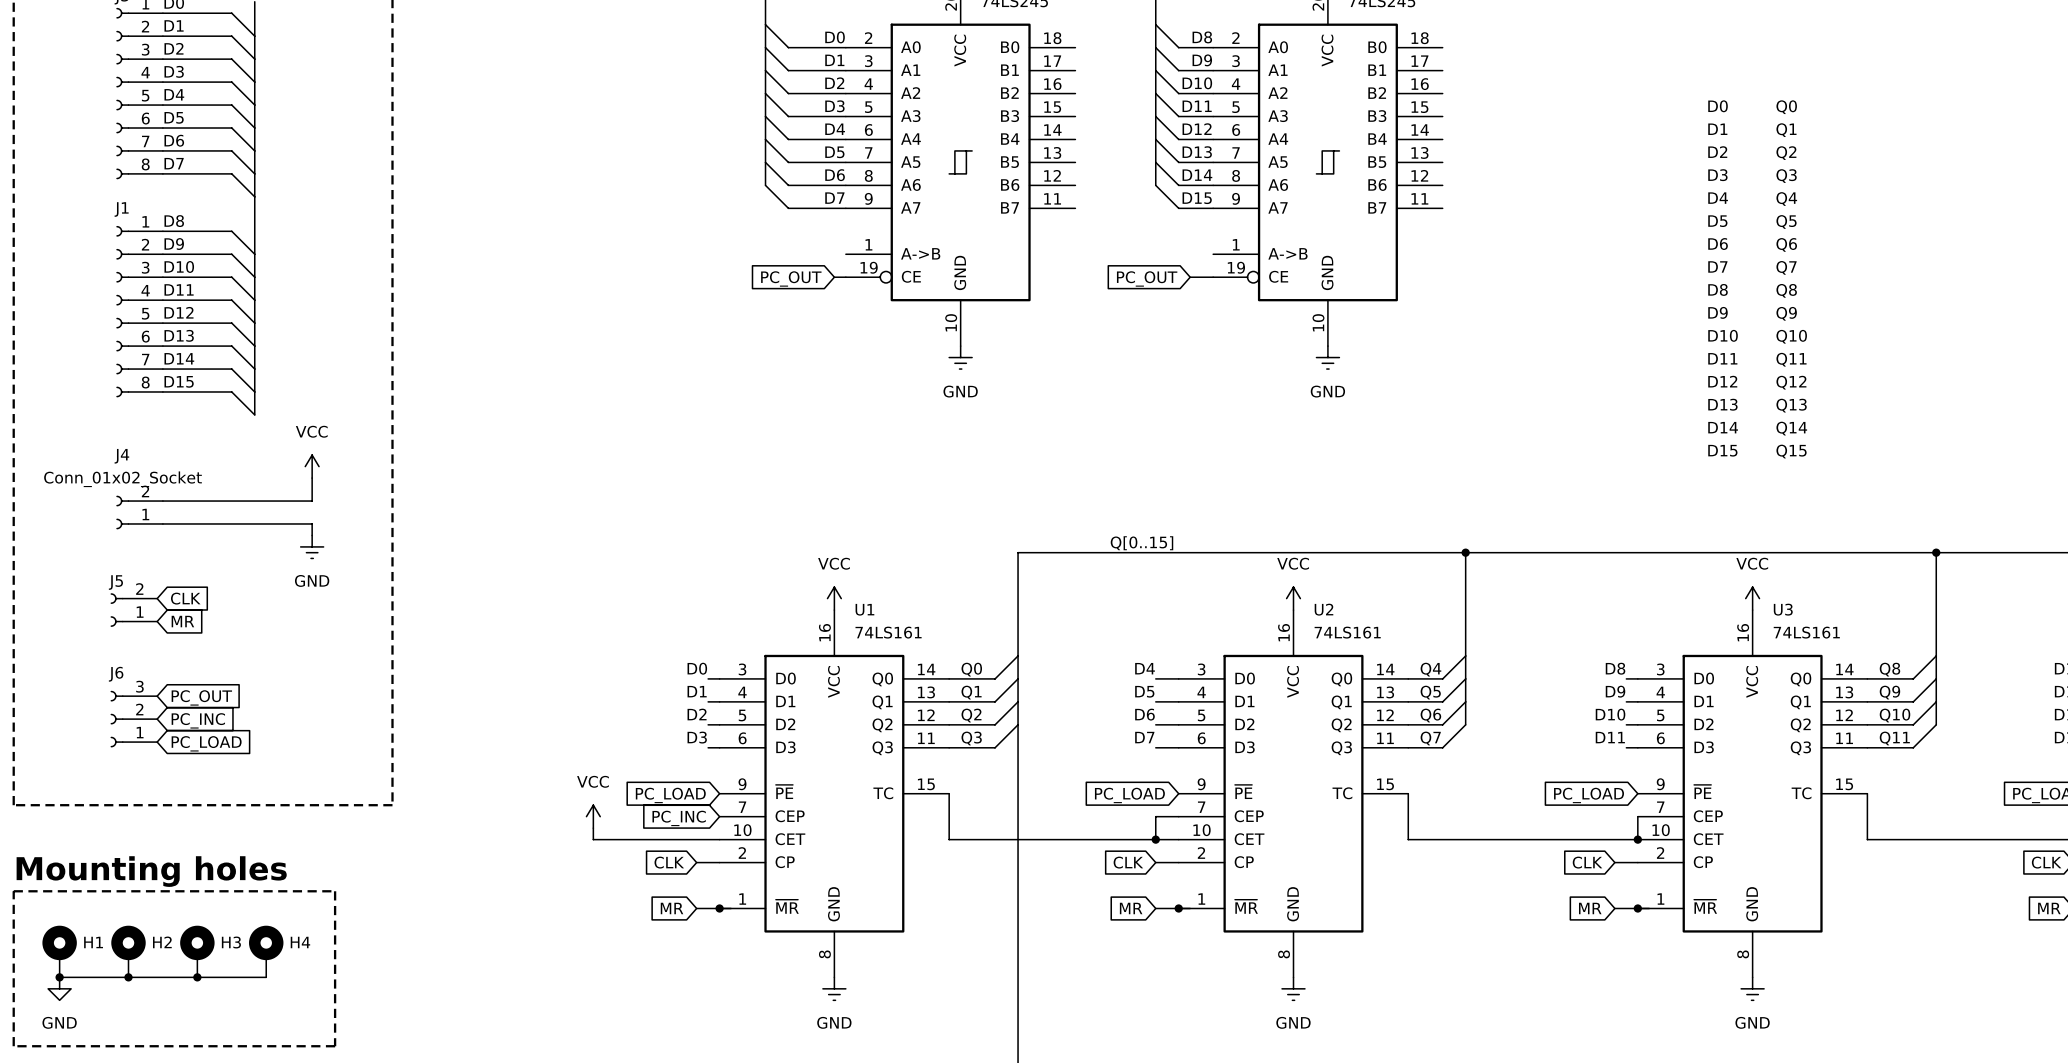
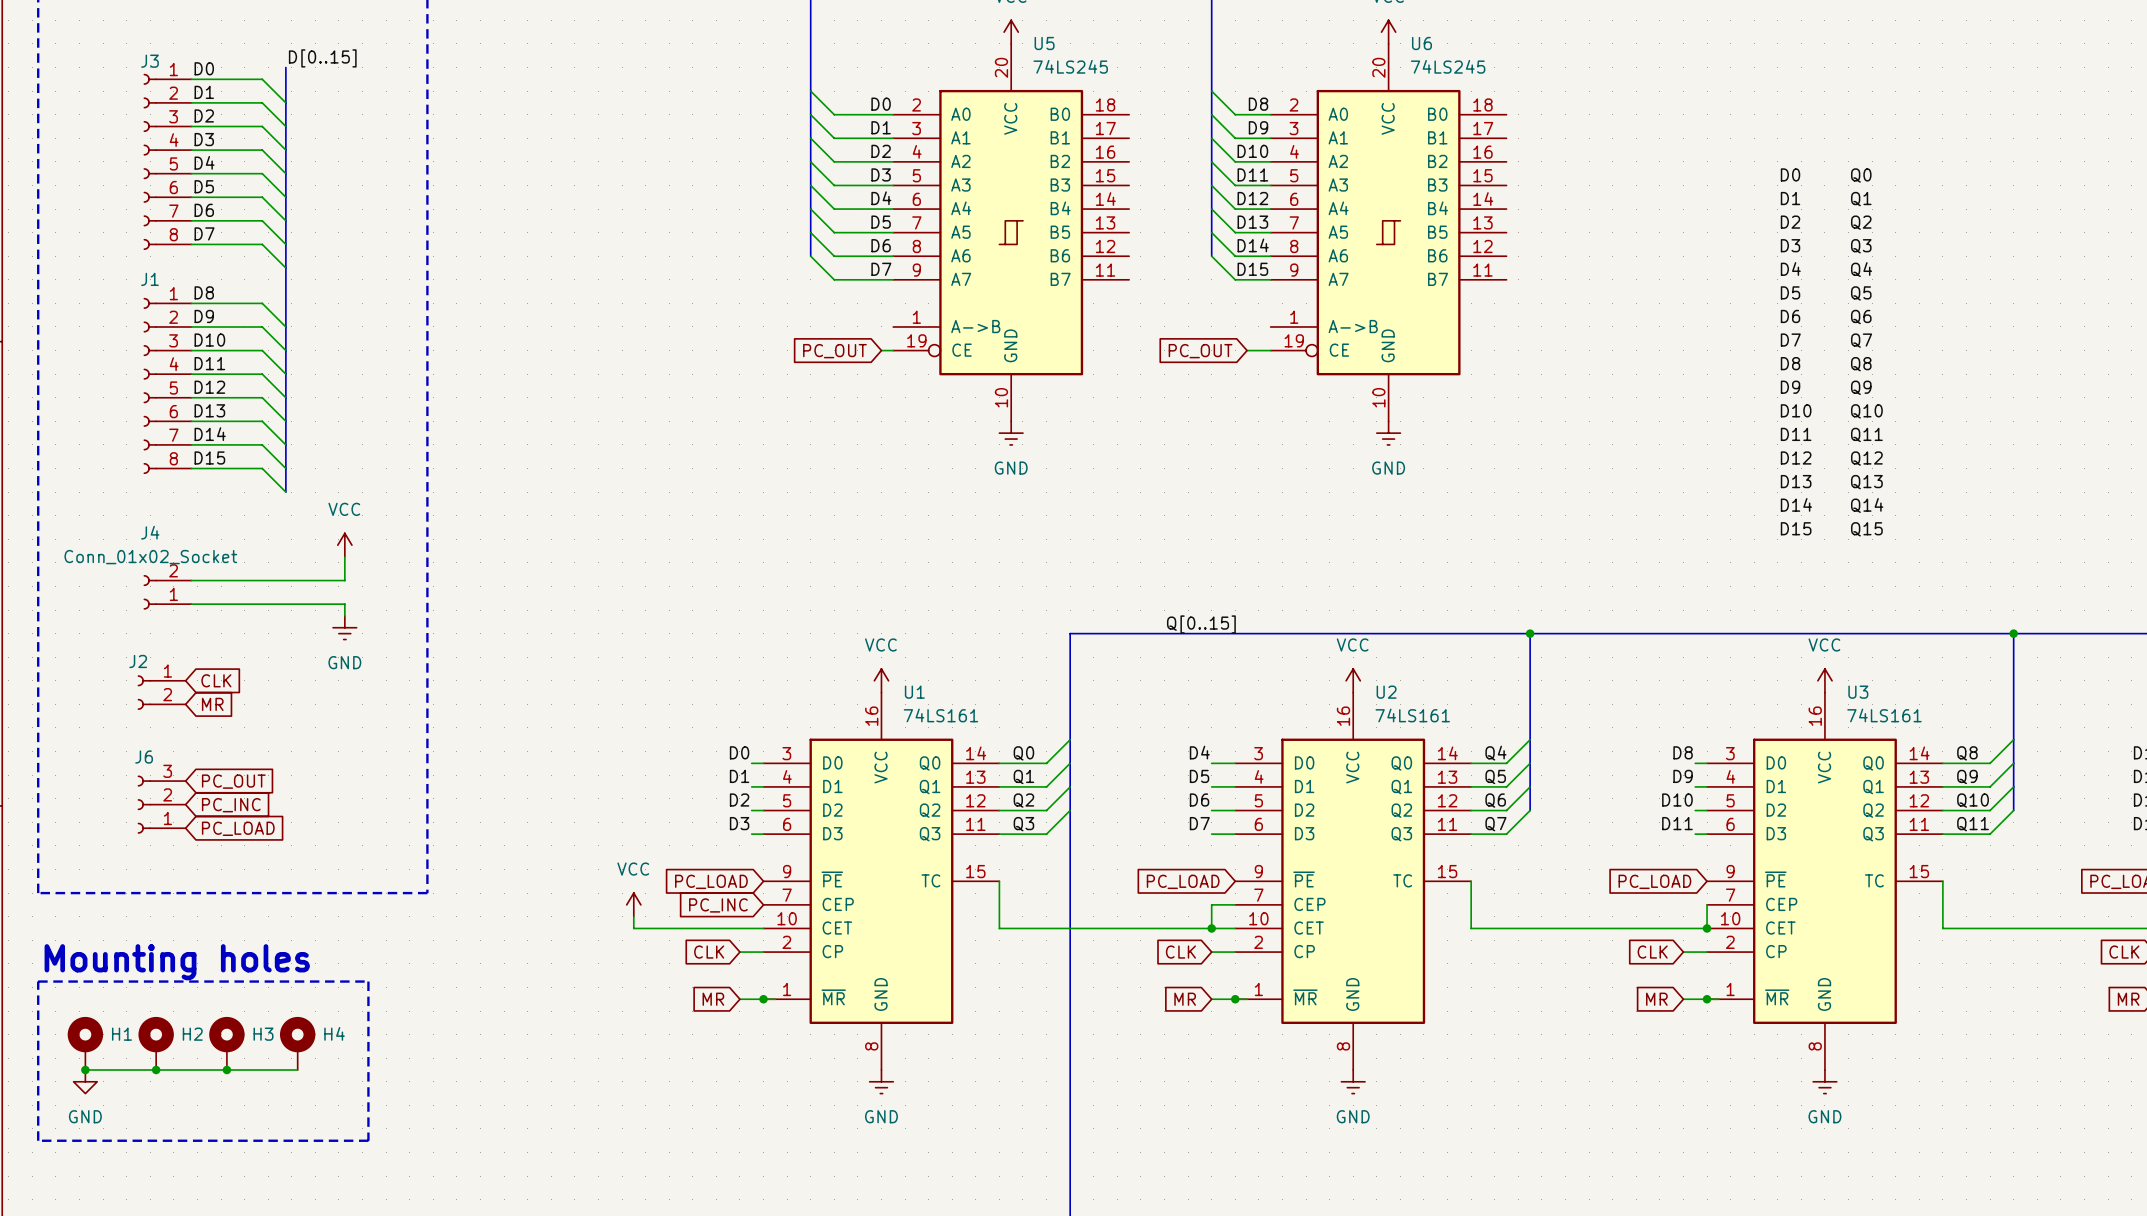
J5 name: J5 (115, 582) -> J2 (138, 661)
J5 flip: as is (117, 610) -> up-down (144, 692)

